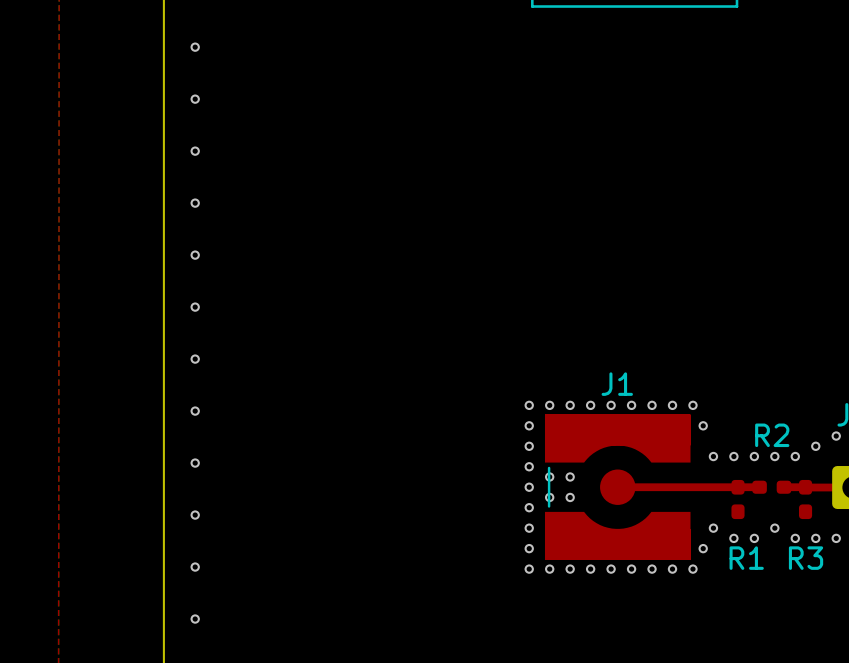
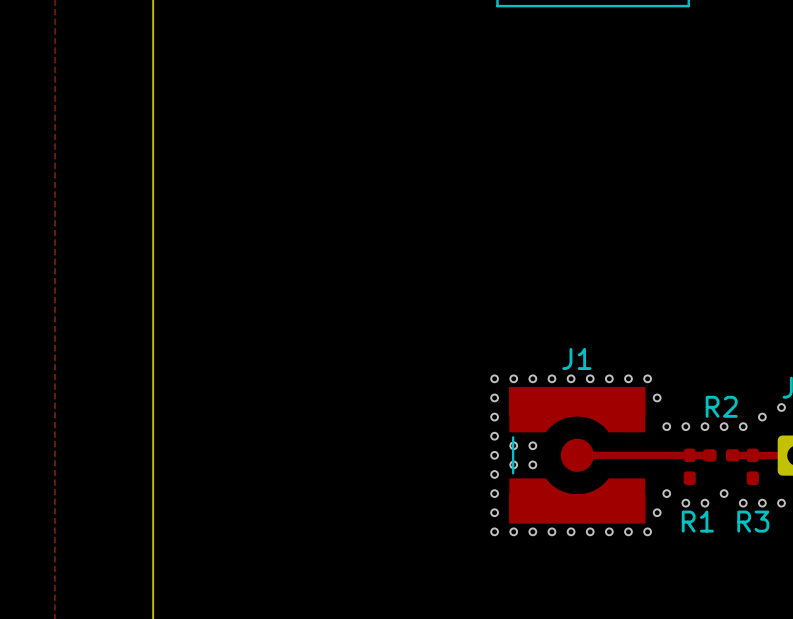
via: (195, 47) -> none
via: (195, 99) -> none
via: (195, 151) -> none
via: (195, 203) -> none
via: (195, 255) -> none
via: (195, 307) -> none
via: (195, 359) -> none
via: (195, 411) -> none
via: (195, 463) -> none
via: (195, 515) -> none
via: (195, 567) -> none
via: (195, 619) -> none

